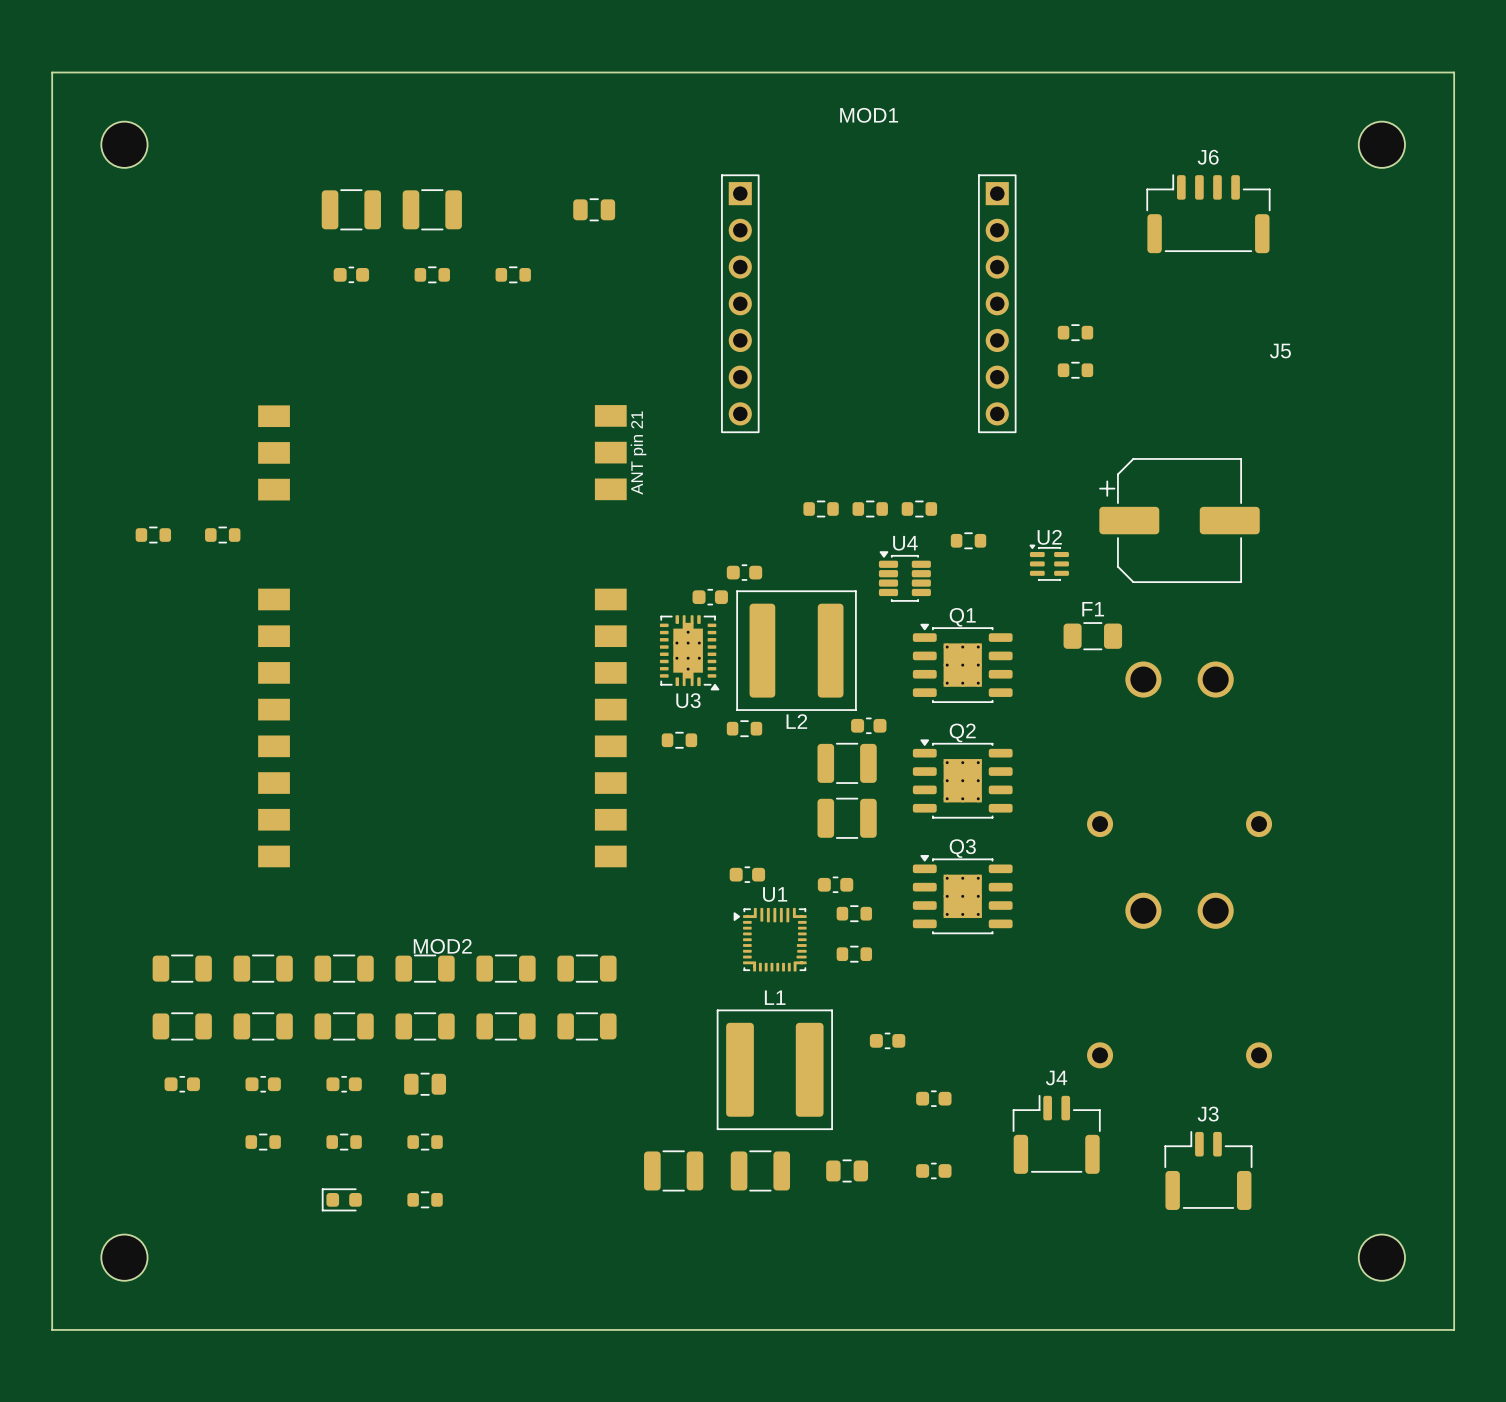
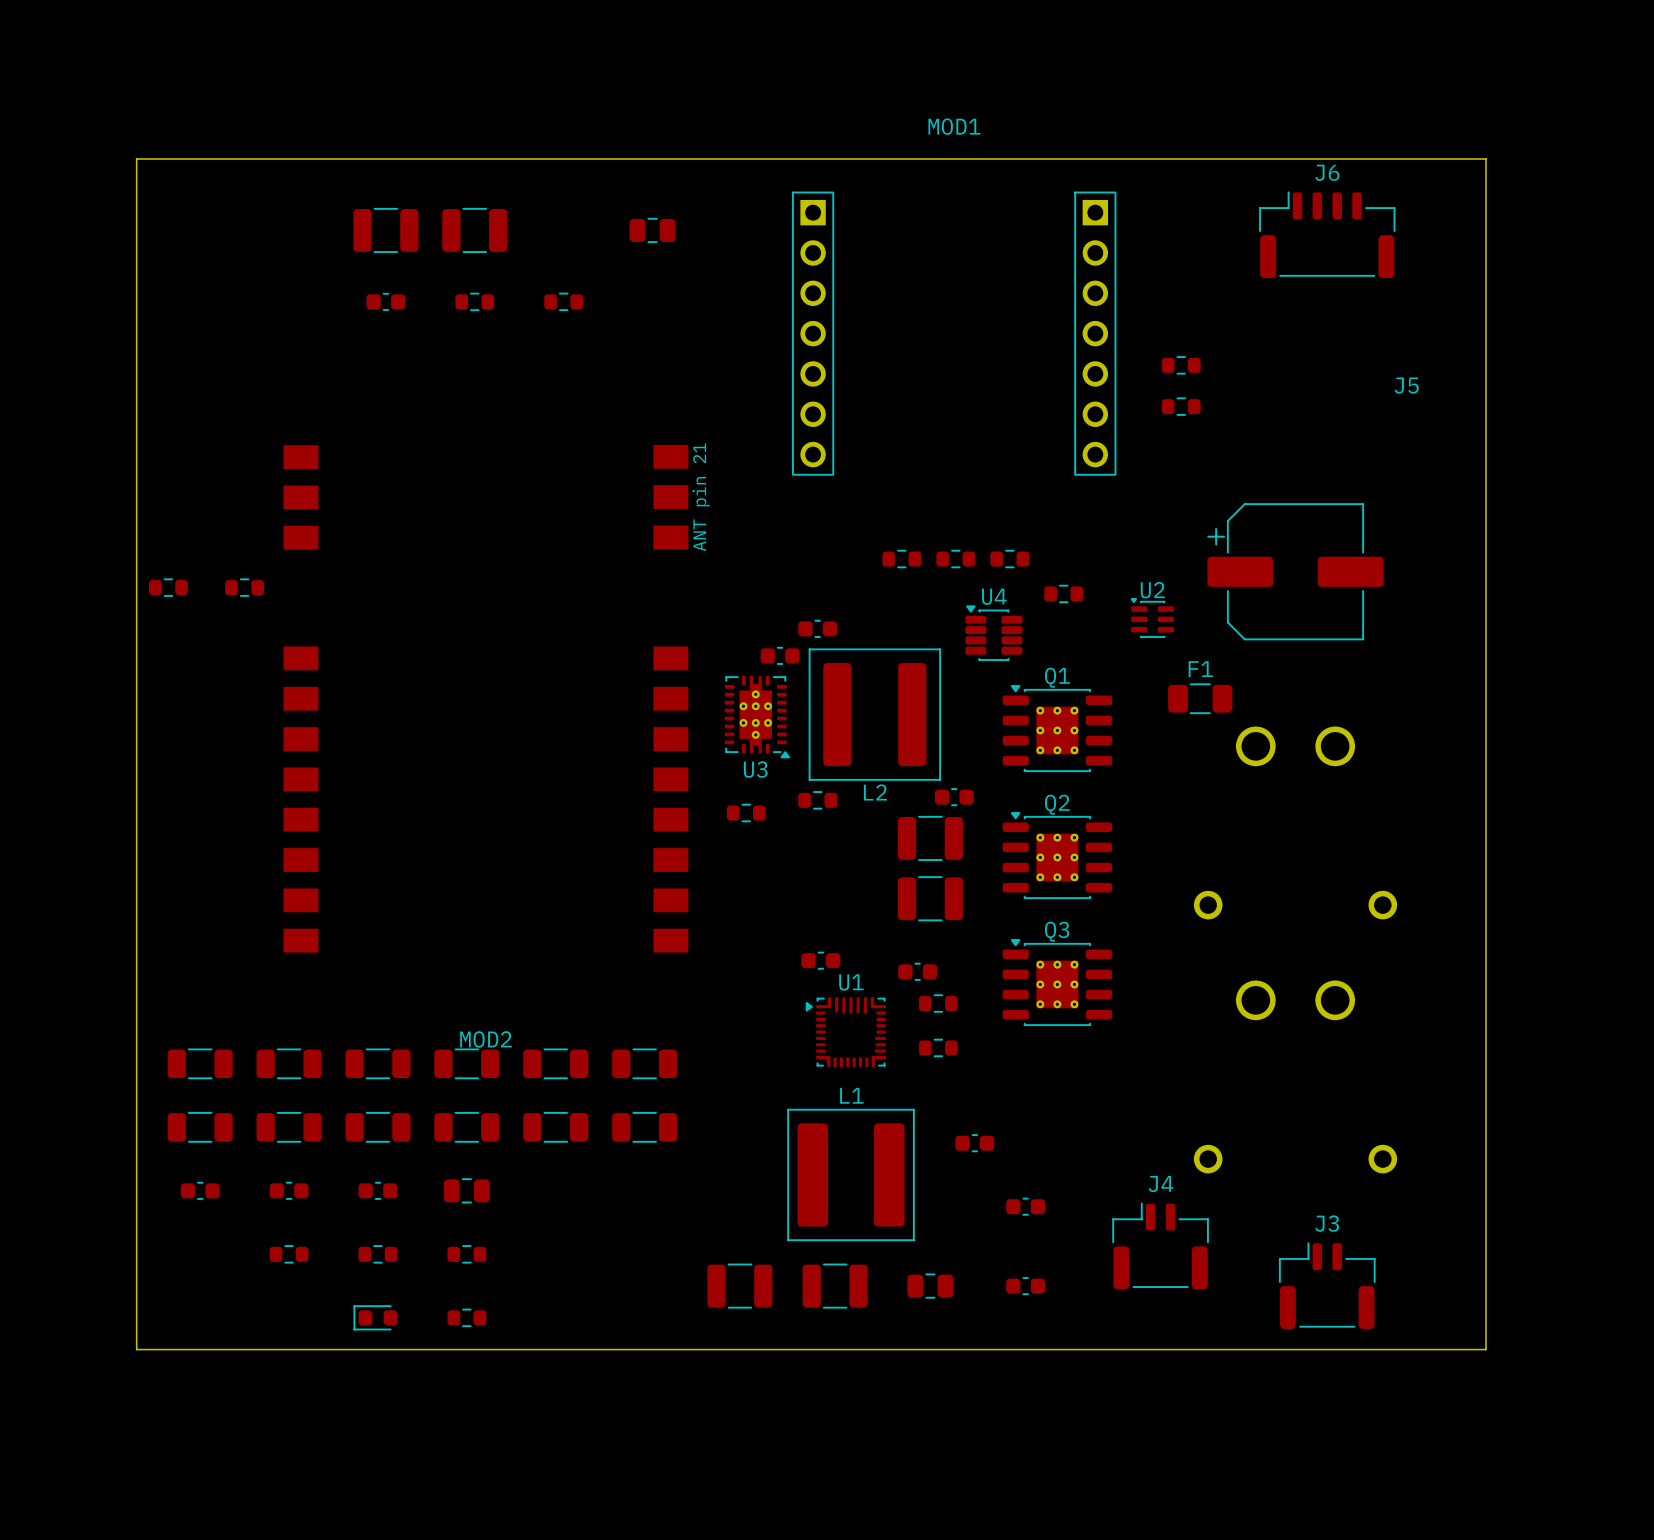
board edge: (52, 72) (1454, 72) (1454, 1329) (52, 1329) (52, 72) -> (136, 159) (136, 1349) (1485, 1349) (1485, 159) (136, 159)
part: (124, 144) -> none
part: (1381, 144) -> none
part: (124, 1257) -> none
part: (1381, 1257) -> none

